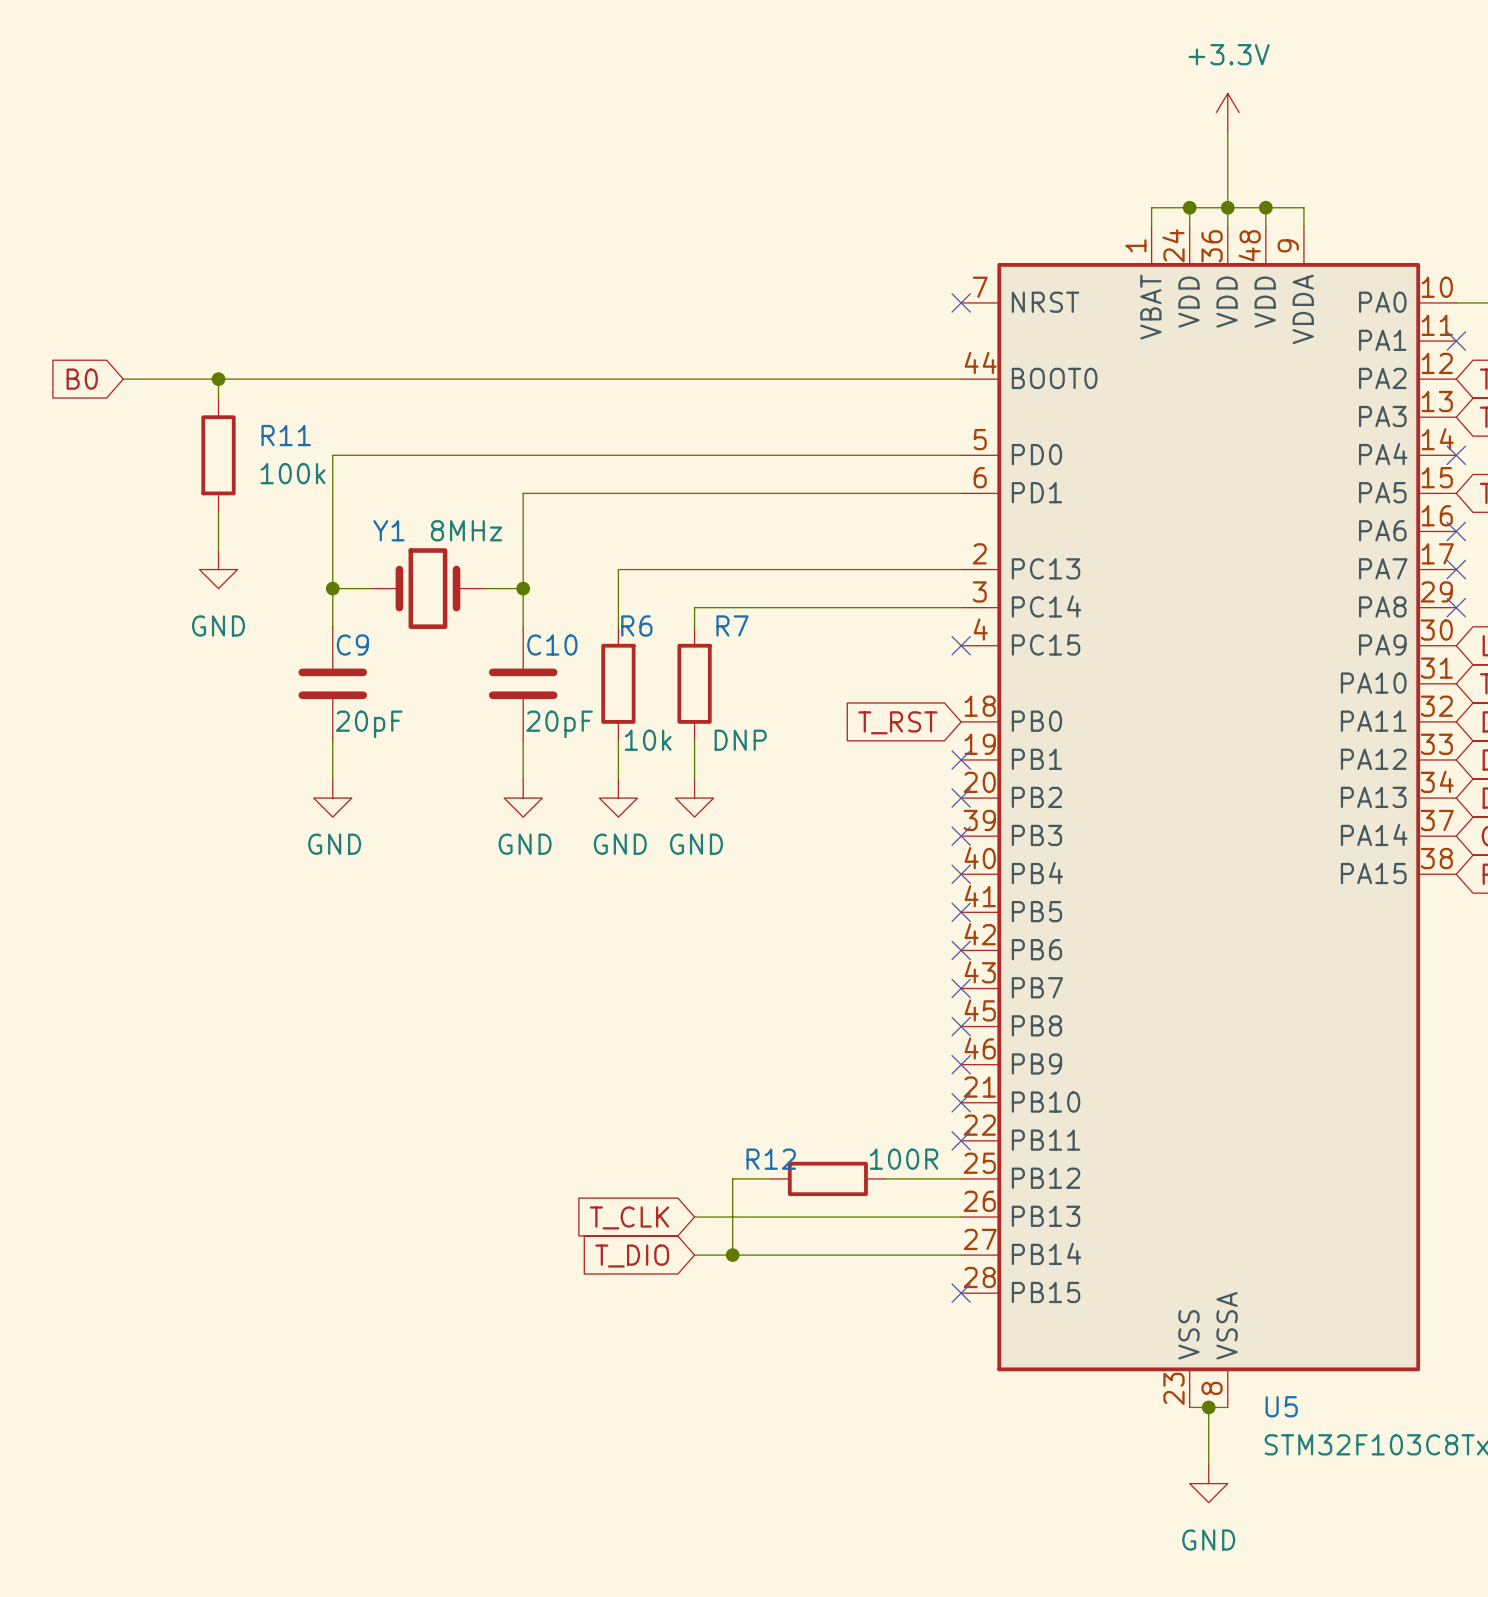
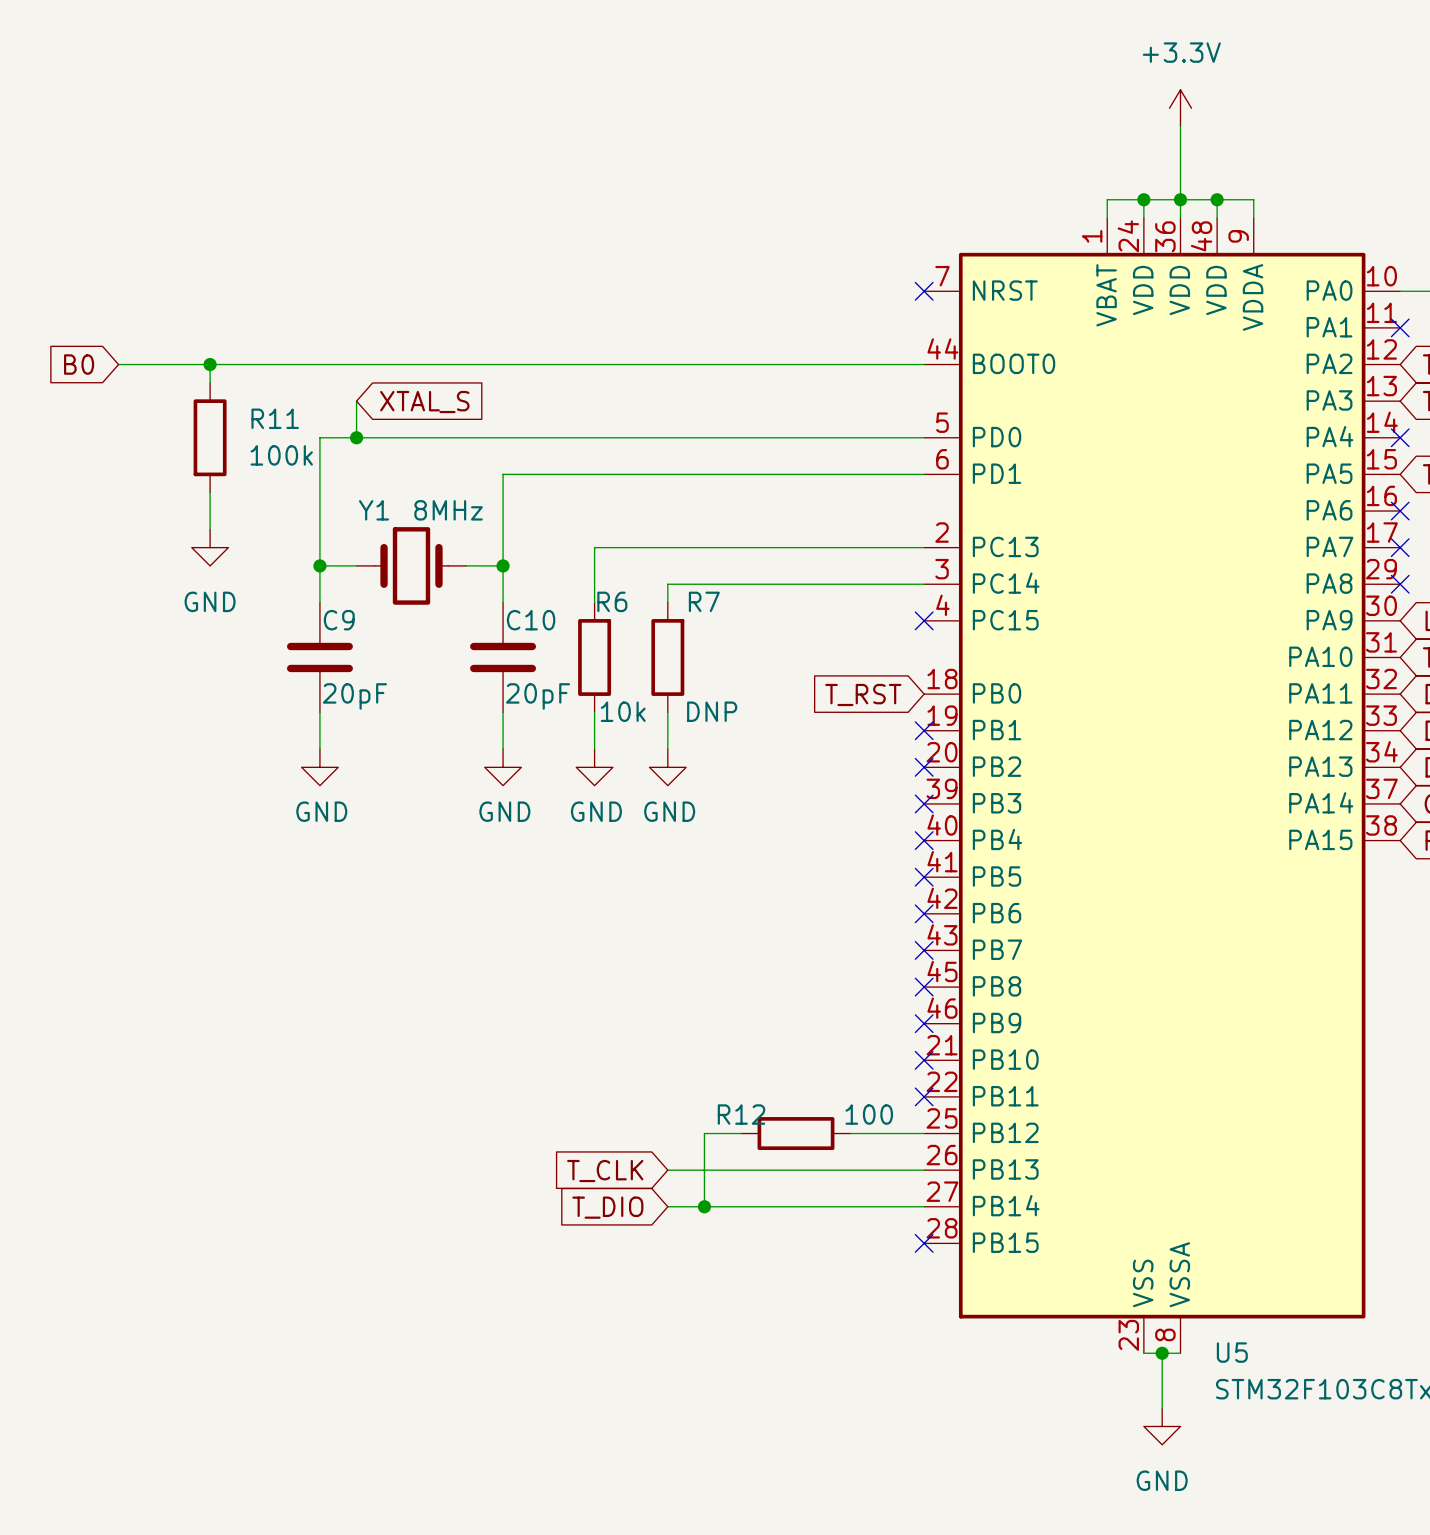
wire: none -> (356, 401) (356, 437)
global label: none -> XTAL_S (424, 402)
junction: none -> (356, 437)
R12 value: 100R (904, 1159) -> 100 (869, 1114)

